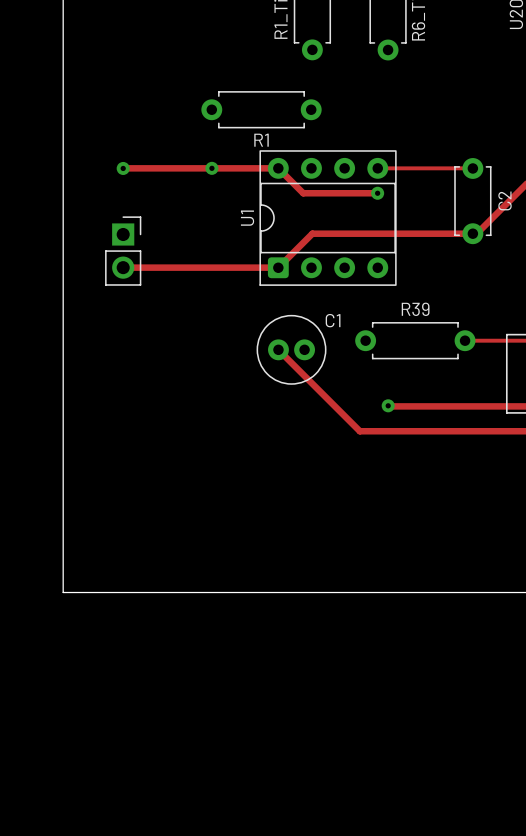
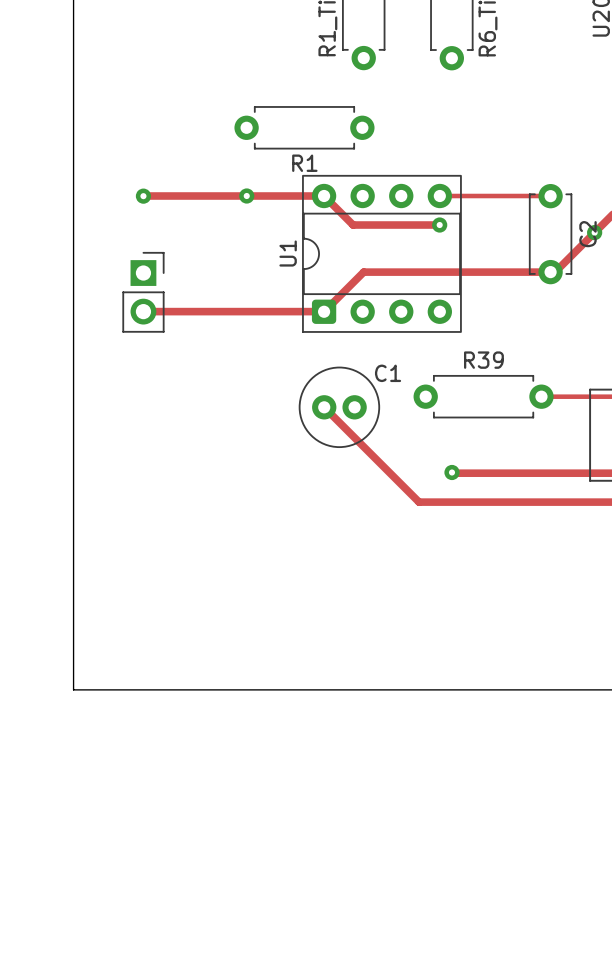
via: none -> (594, 232)

